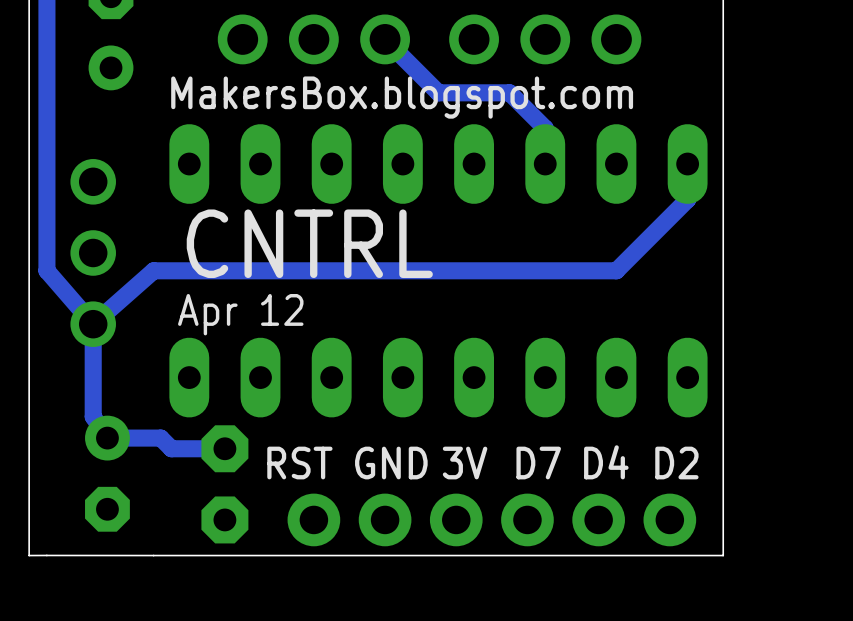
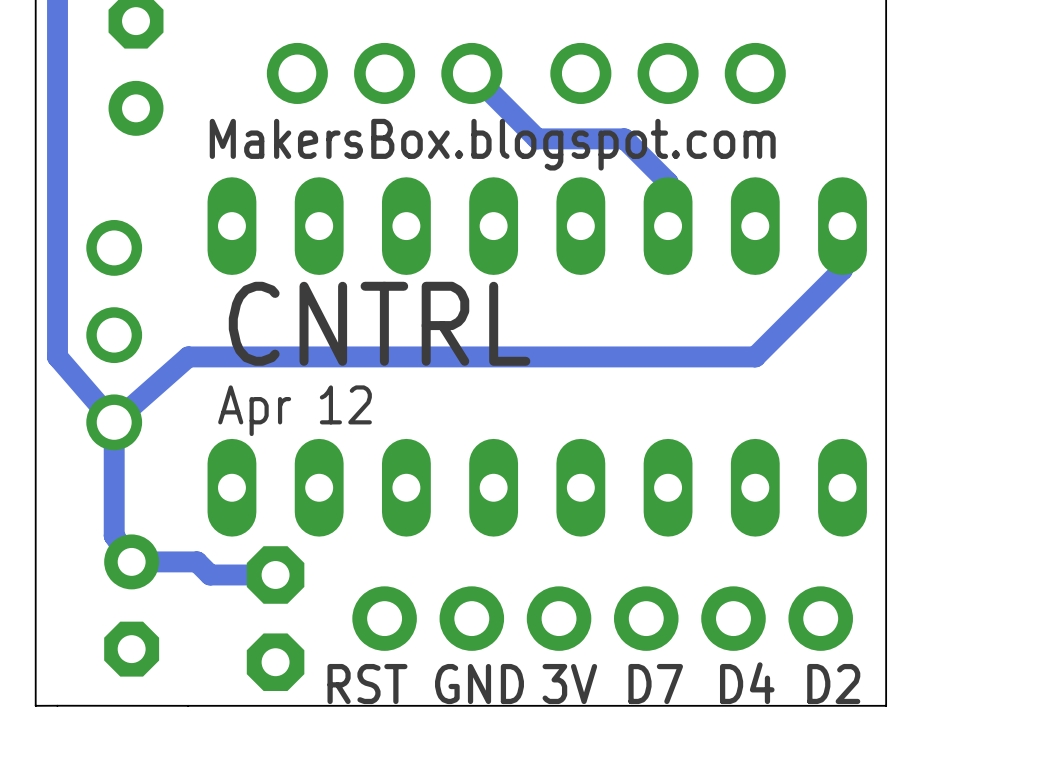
text position: D4 (606, 462) -> D4 (747, 683)
text position: RST (299, 463) -> RST (367, 684)
text position: GND (391, 463) -> GND (479, 684)
text position: 3V (465, 463) -> 3V (569, 684)
text position: D7 (538, 463) -> D7 (655, 684)
text position: D2 (676, 463) -> D2 (833, 684)
part position: (491, 519) -> (602, 618)

